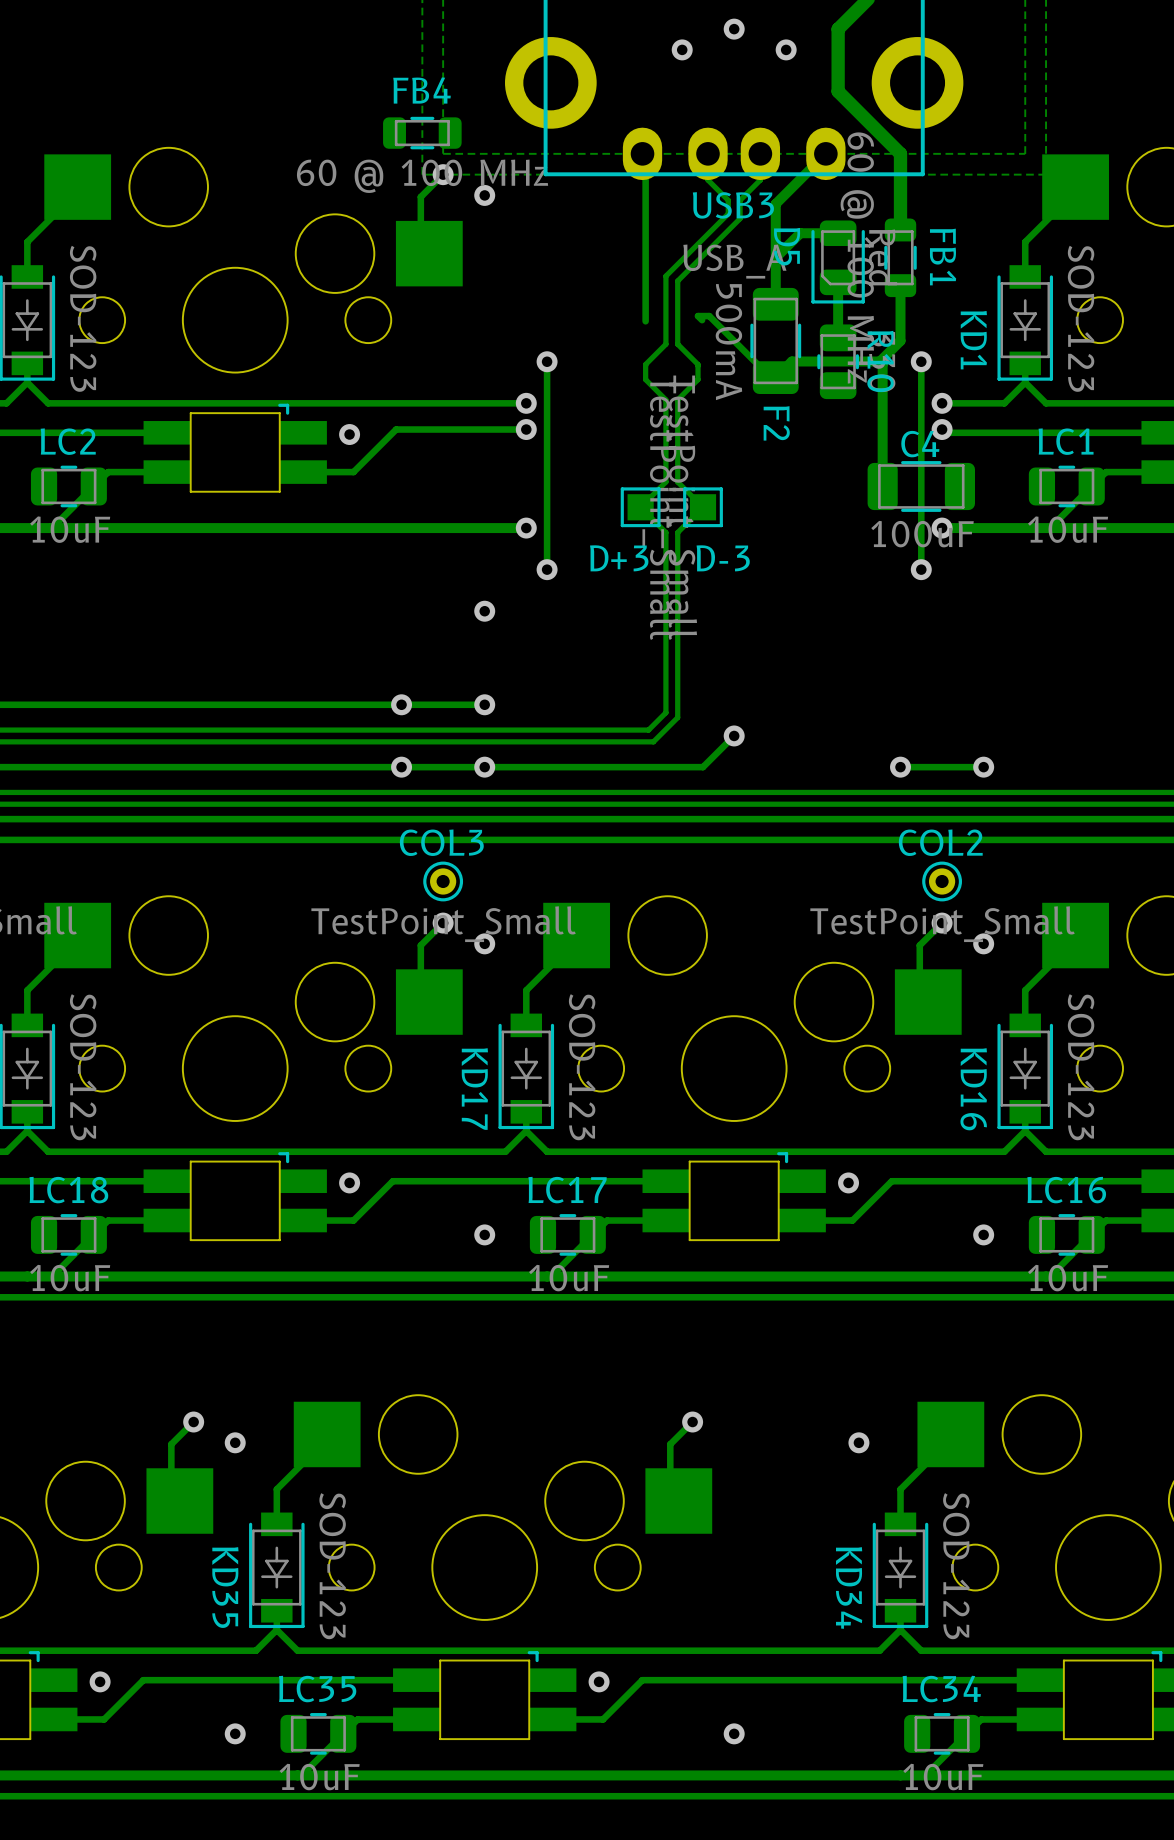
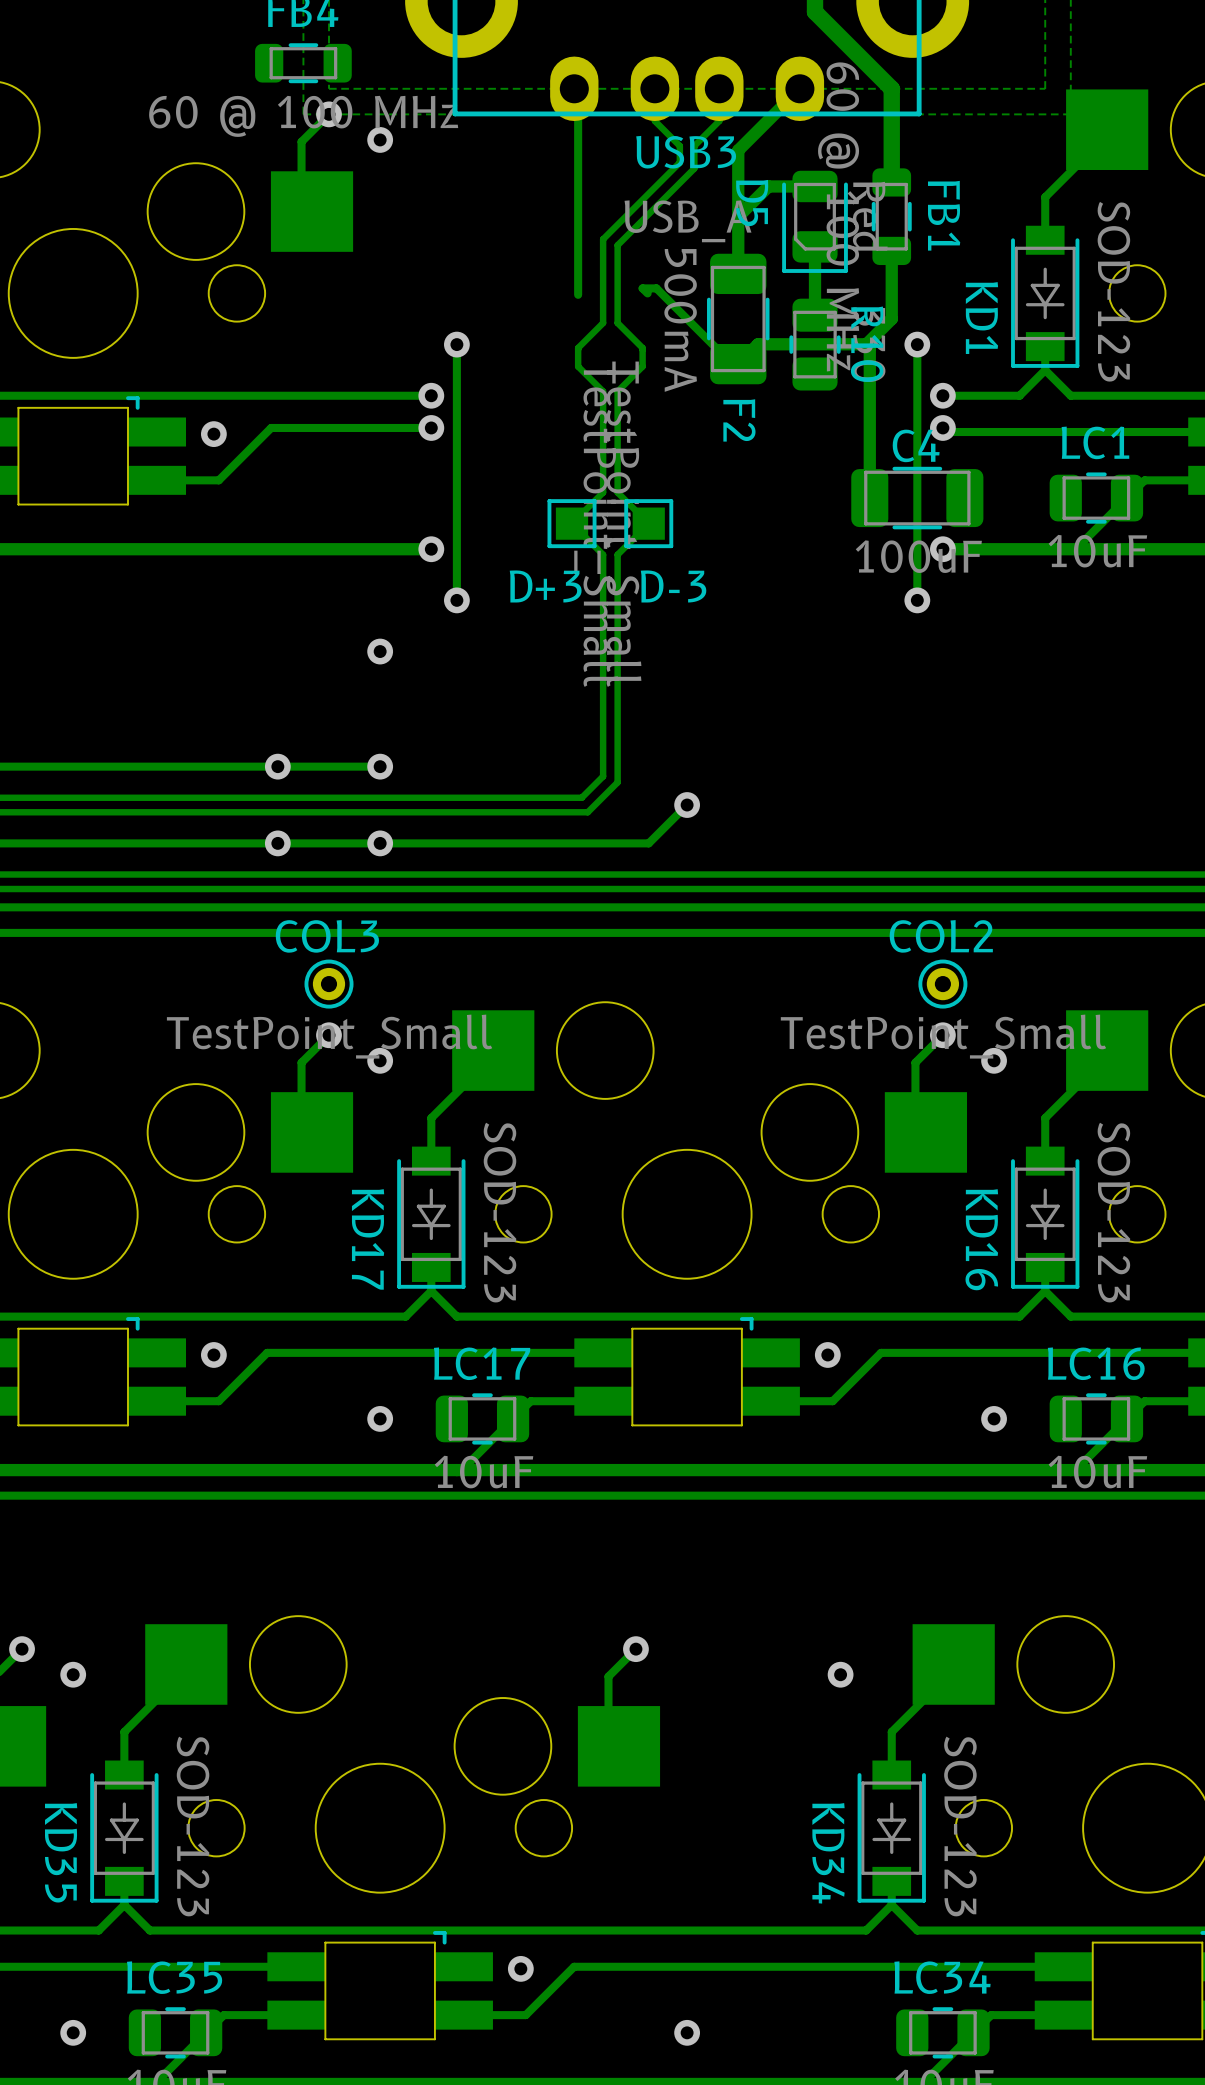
via: (900, 767) -> none
track: (983, 767) (900, 767) -> none
via: (983, 767) -> none

